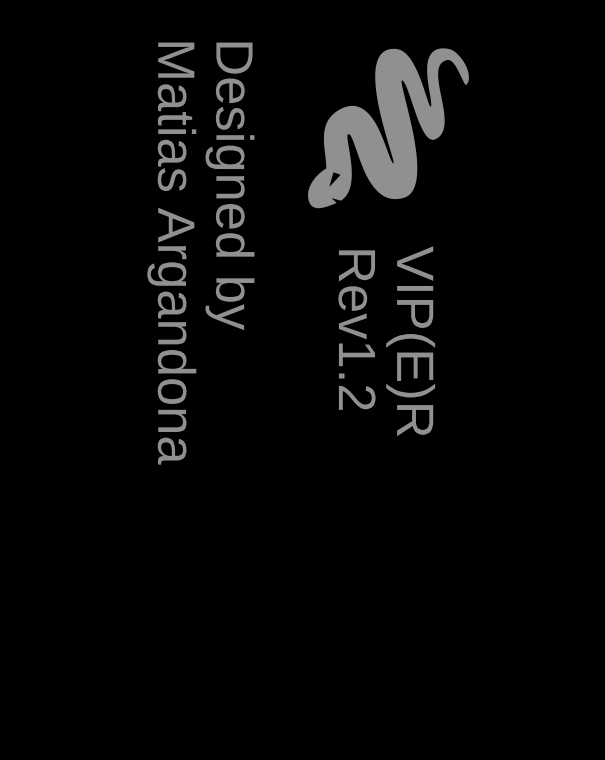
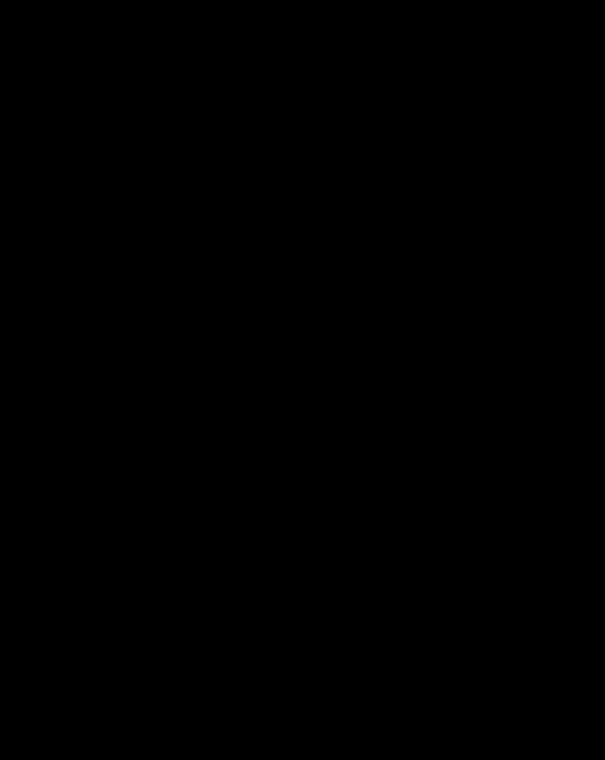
drawing: [308, 48, 469, 209] -> none
text: Designed by (229, 186) -> none
text: Matias Argandona (171, 253) -> none
text: Rev1.2 (356, 330) -> none
text: VIP(E)R (410, 341) -> none

